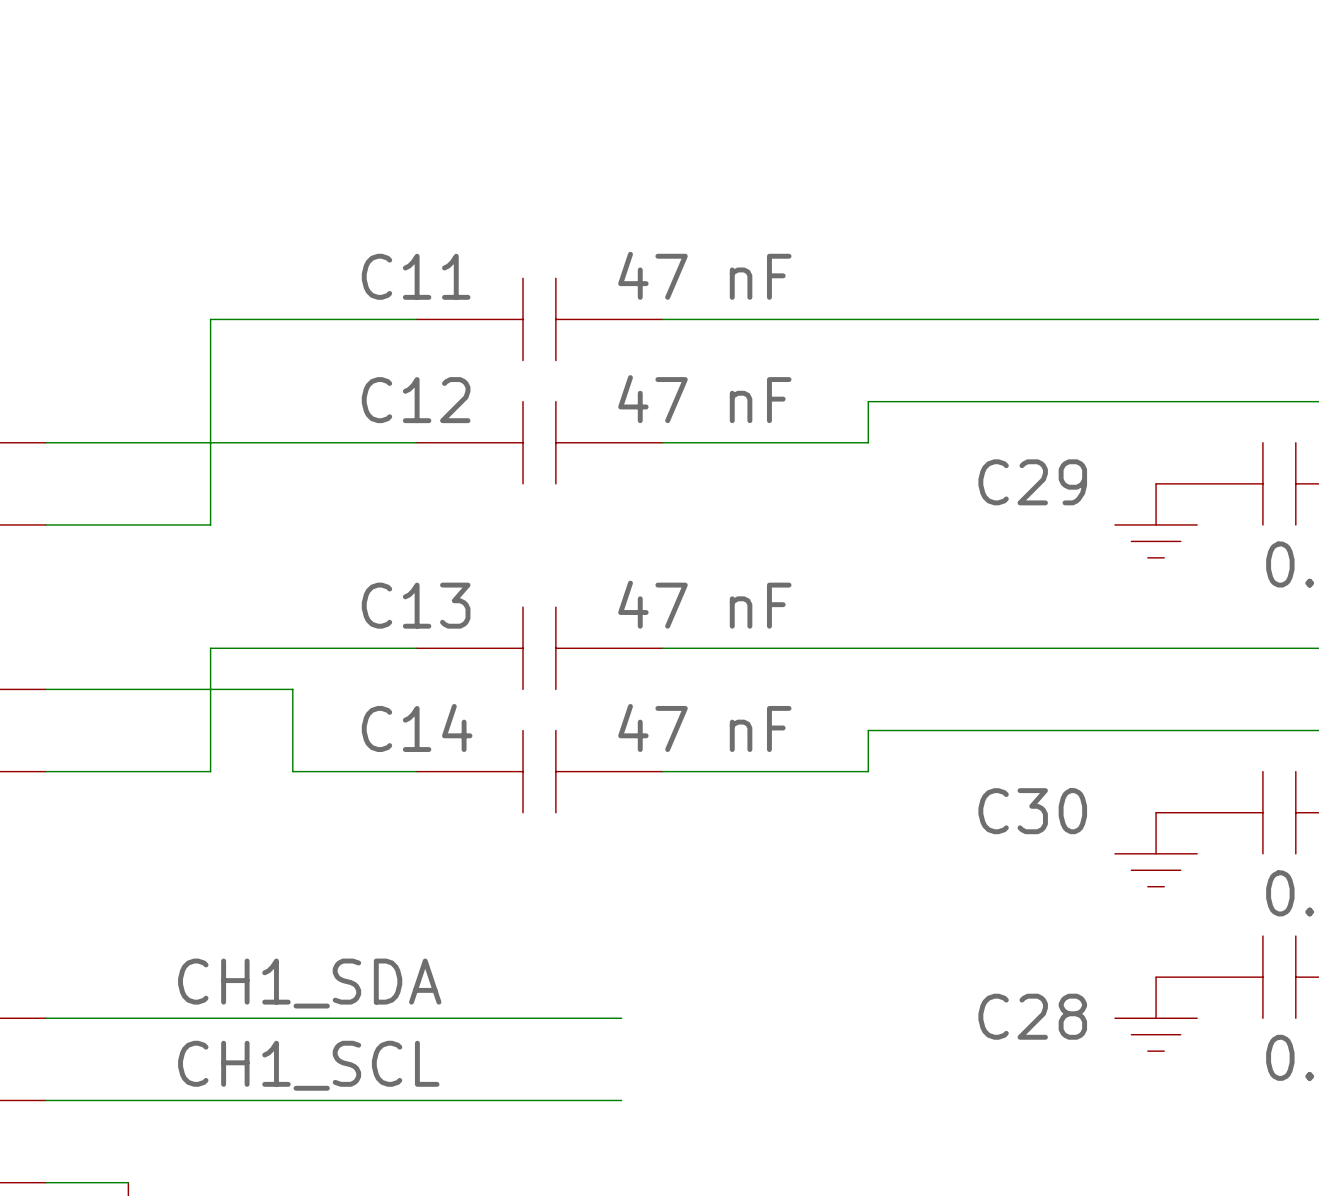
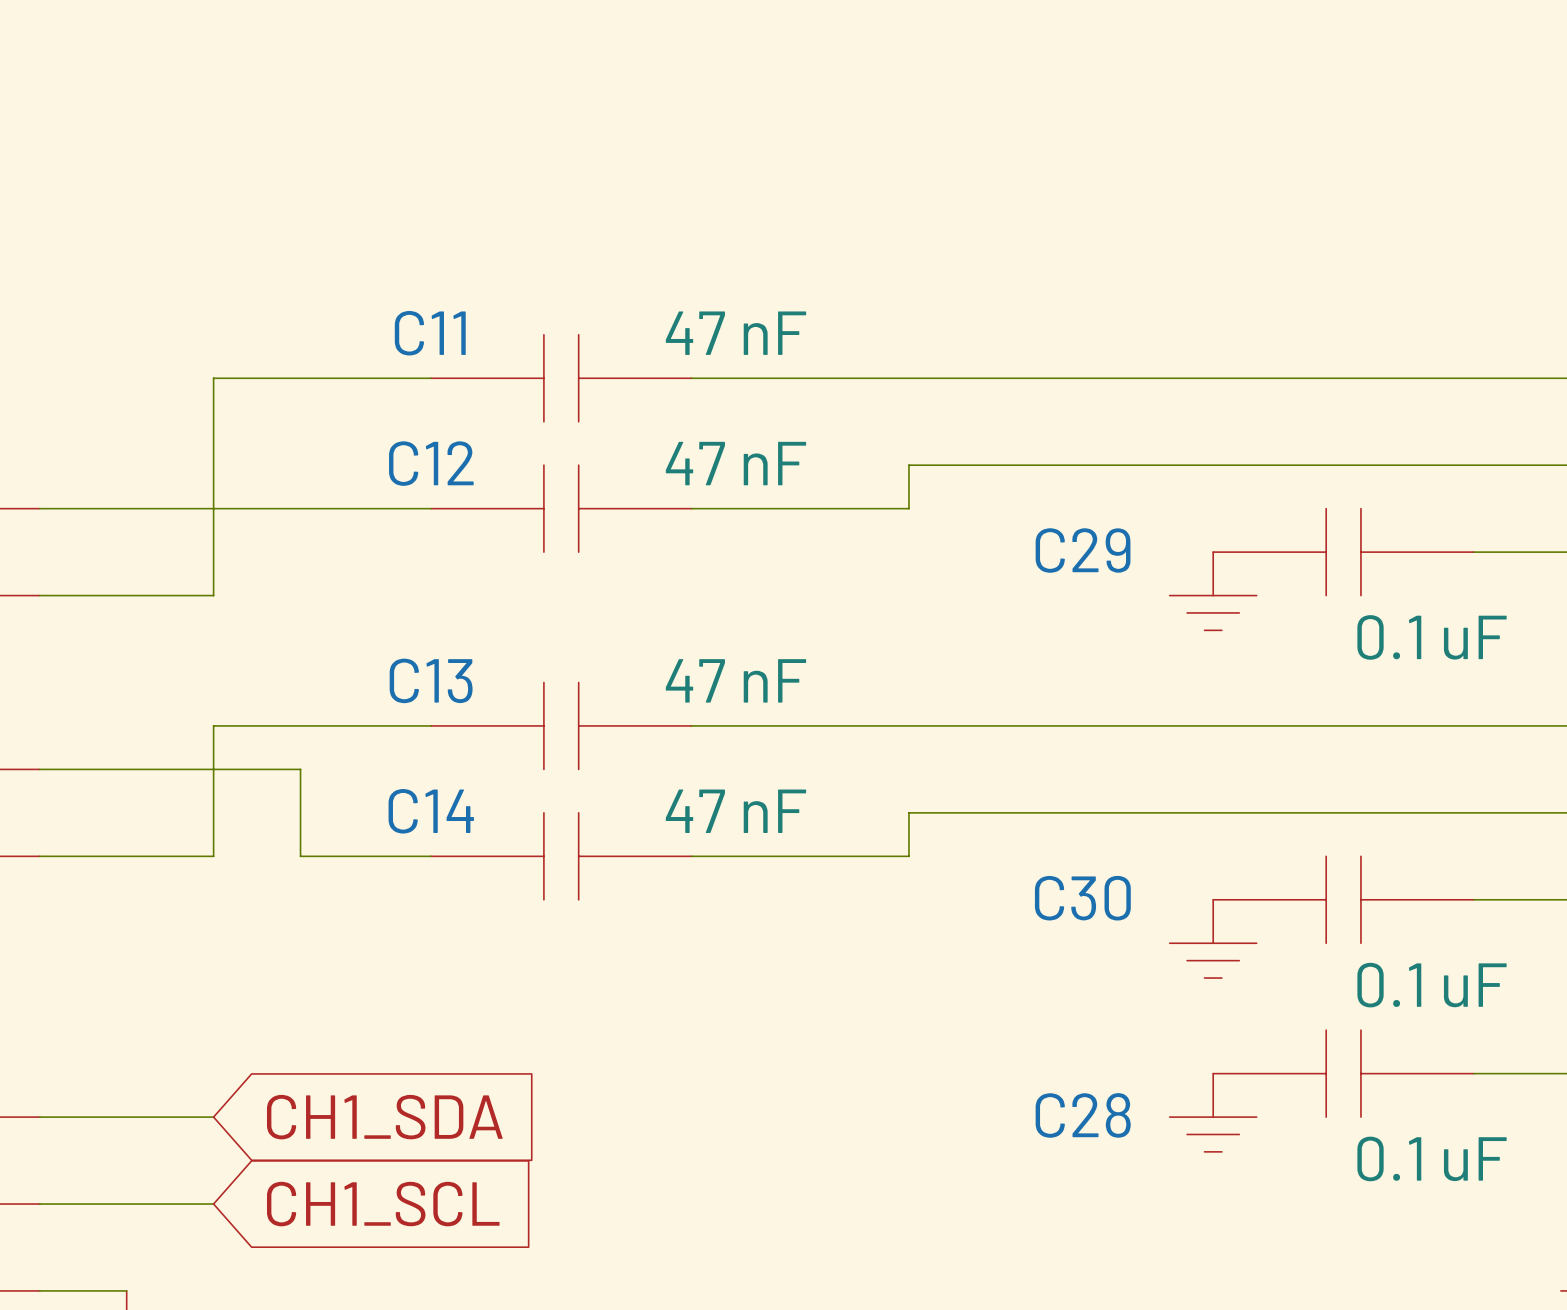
label: CH1_SDA (309, 983) -> none
wire: (210, 1018) (621, 1018) -> none
global label: none -> CH1_SDA (384, 1117)
label: CH1_SCL (308, 1065) -> none
wire: (210, 1100) (621, 1100) -> none
global label: none -> CH1_SCL (383, 1204)

